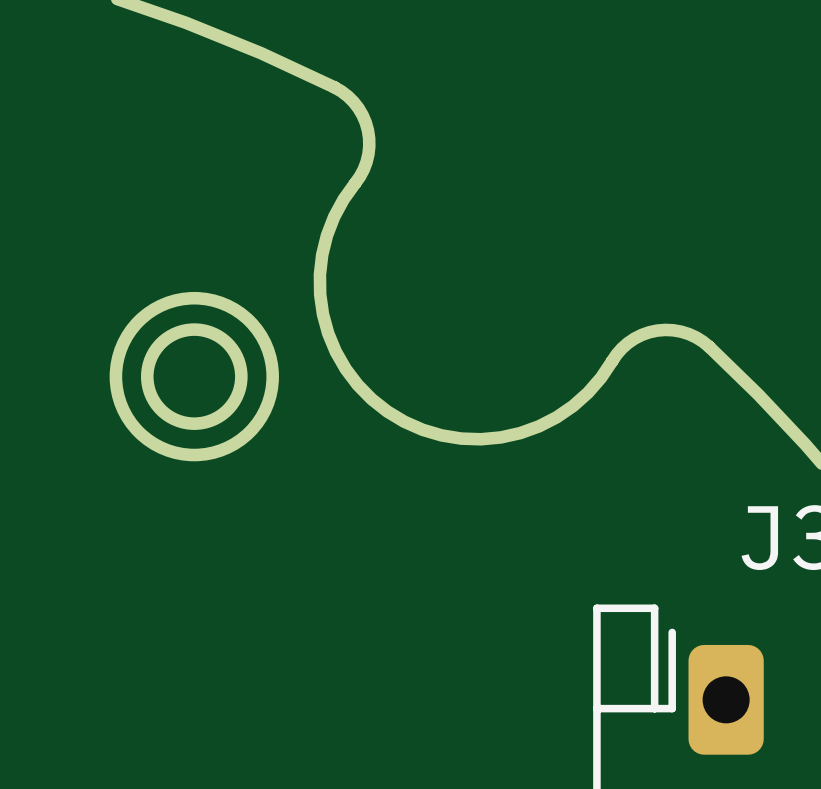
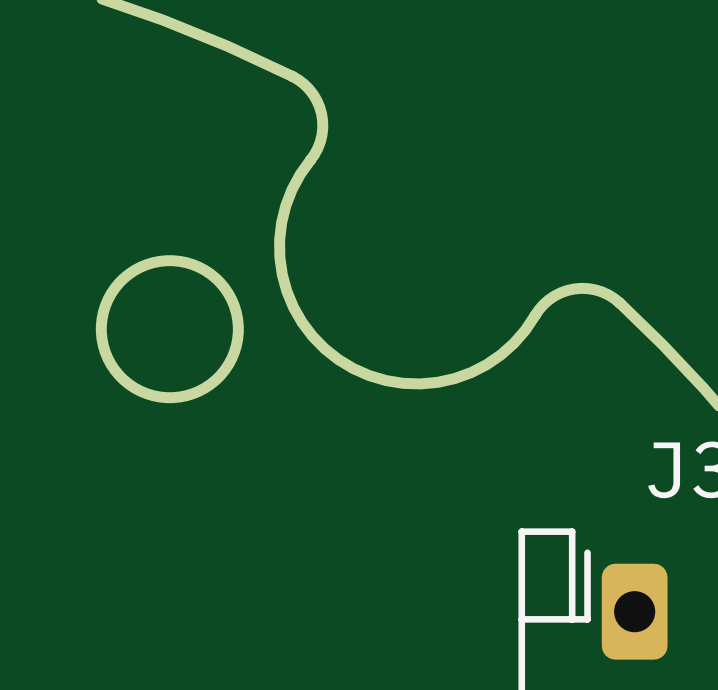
round board edge: [140, 323, 248, 430] -> none

